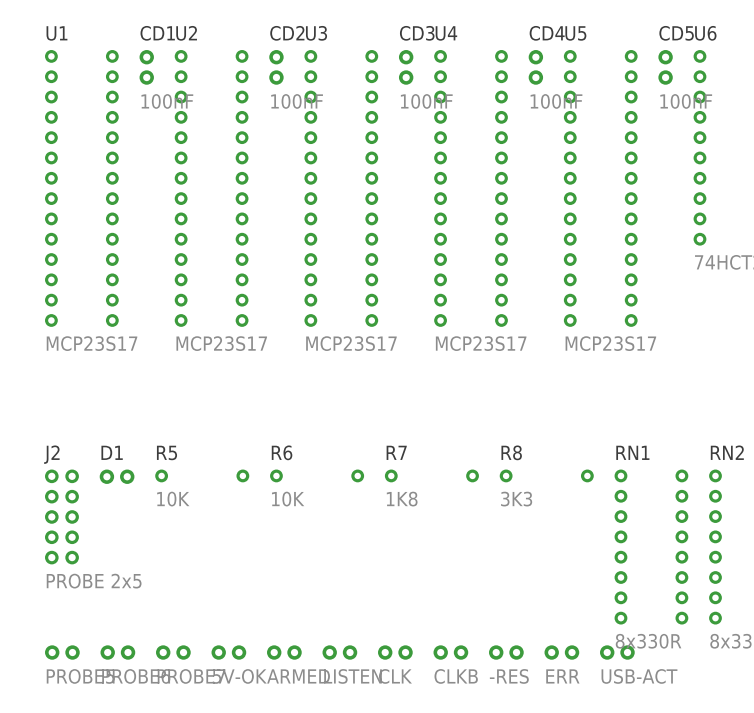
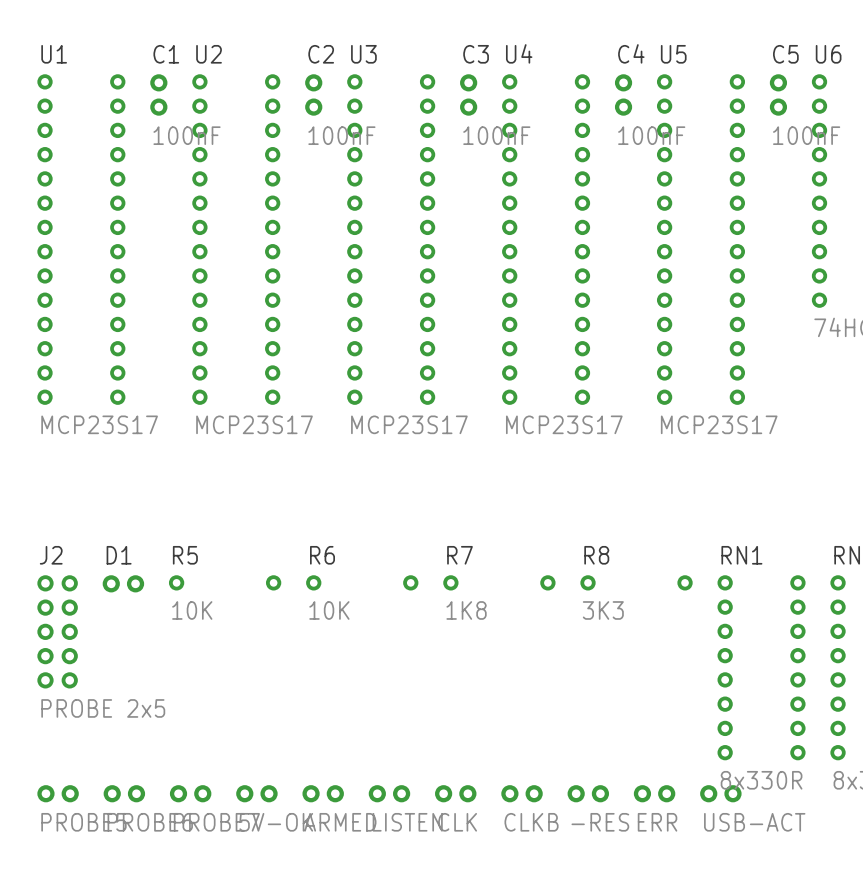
CD1 name: CD1 (157, 33) -> C1 (166, 54)
CD2 name: CD2 (287, 33) -> C2 (321, 54)
CD3 name: CD3 (417, 33) -> C3 (476, 54)
CD4 name: CD4 (547, 33) -> C4 (631, 53)
CD5 name: CD5 (676, 33) -> C5 (785, 54)

